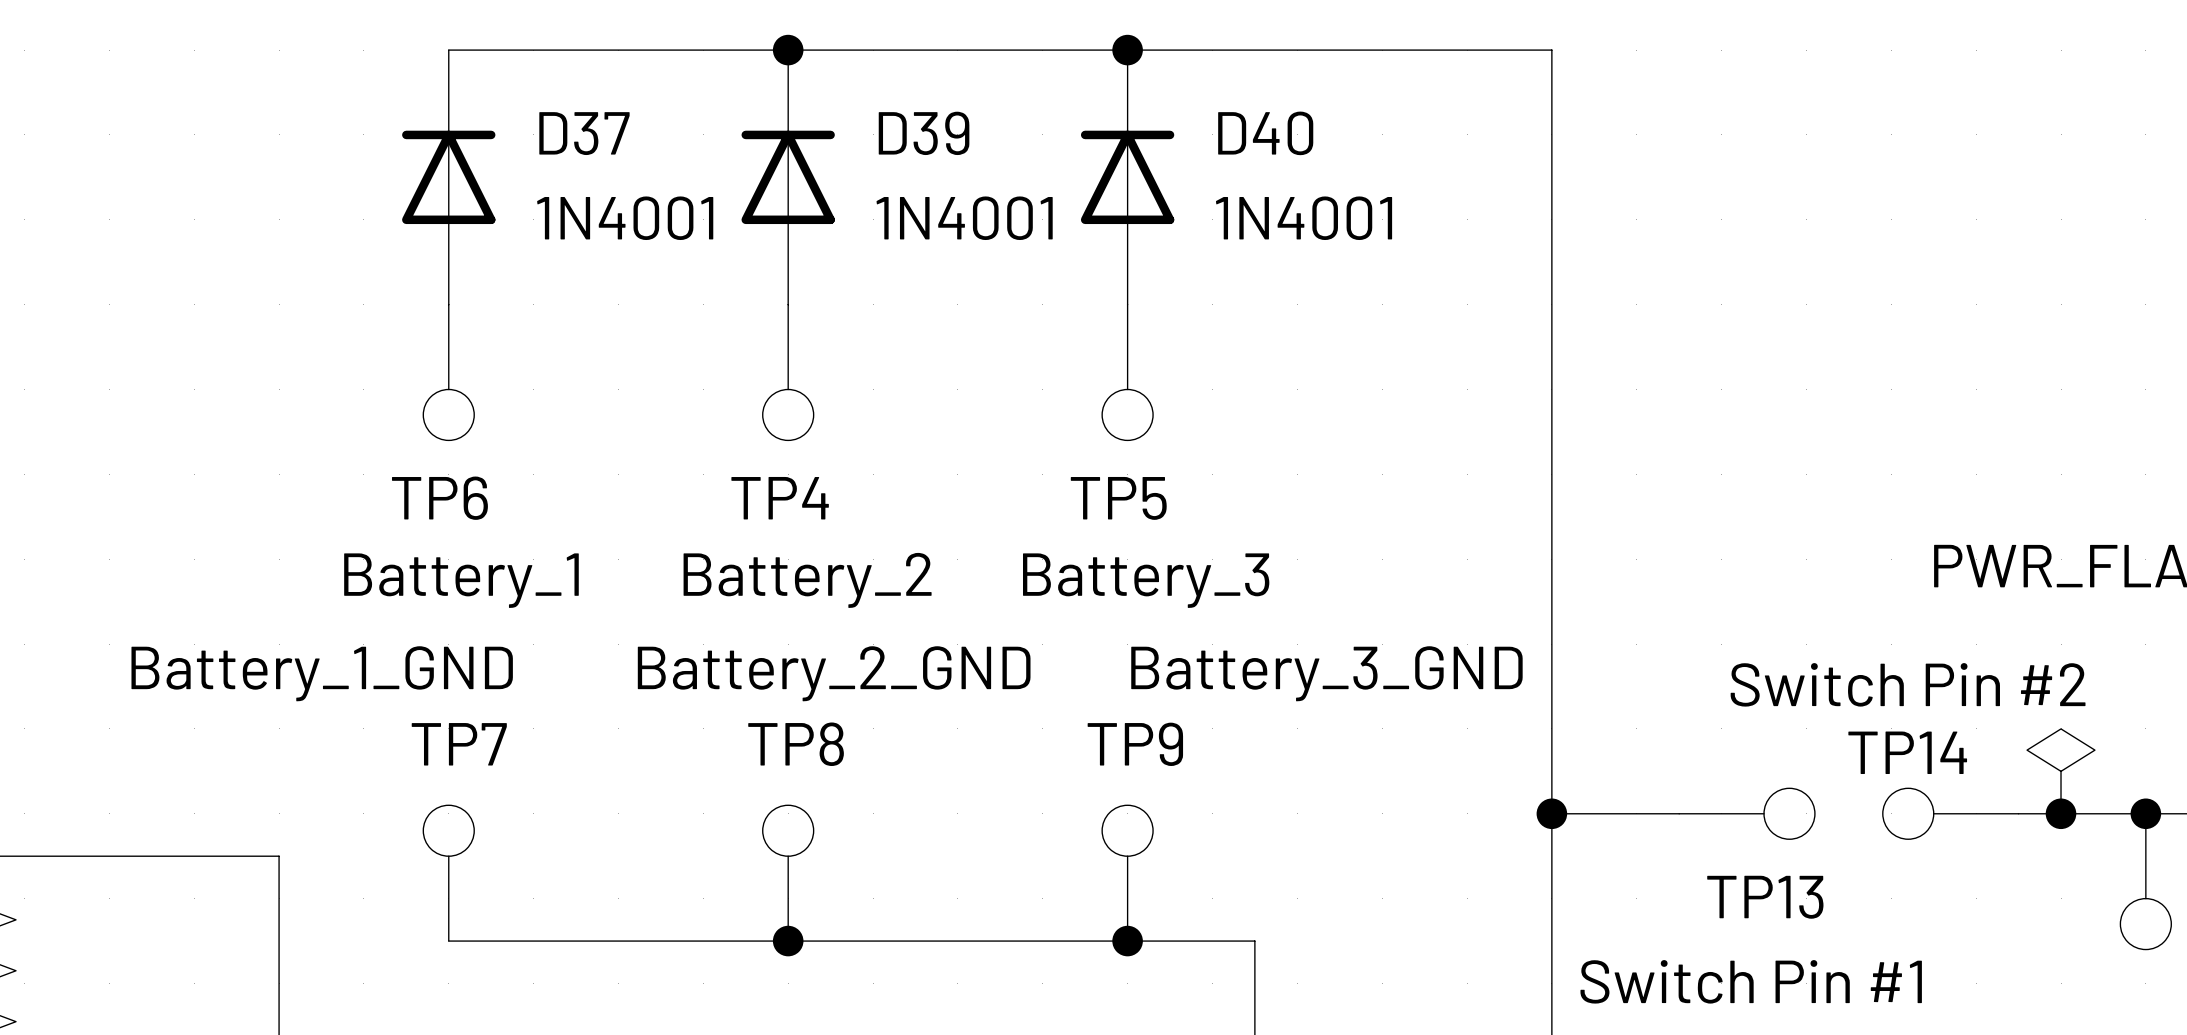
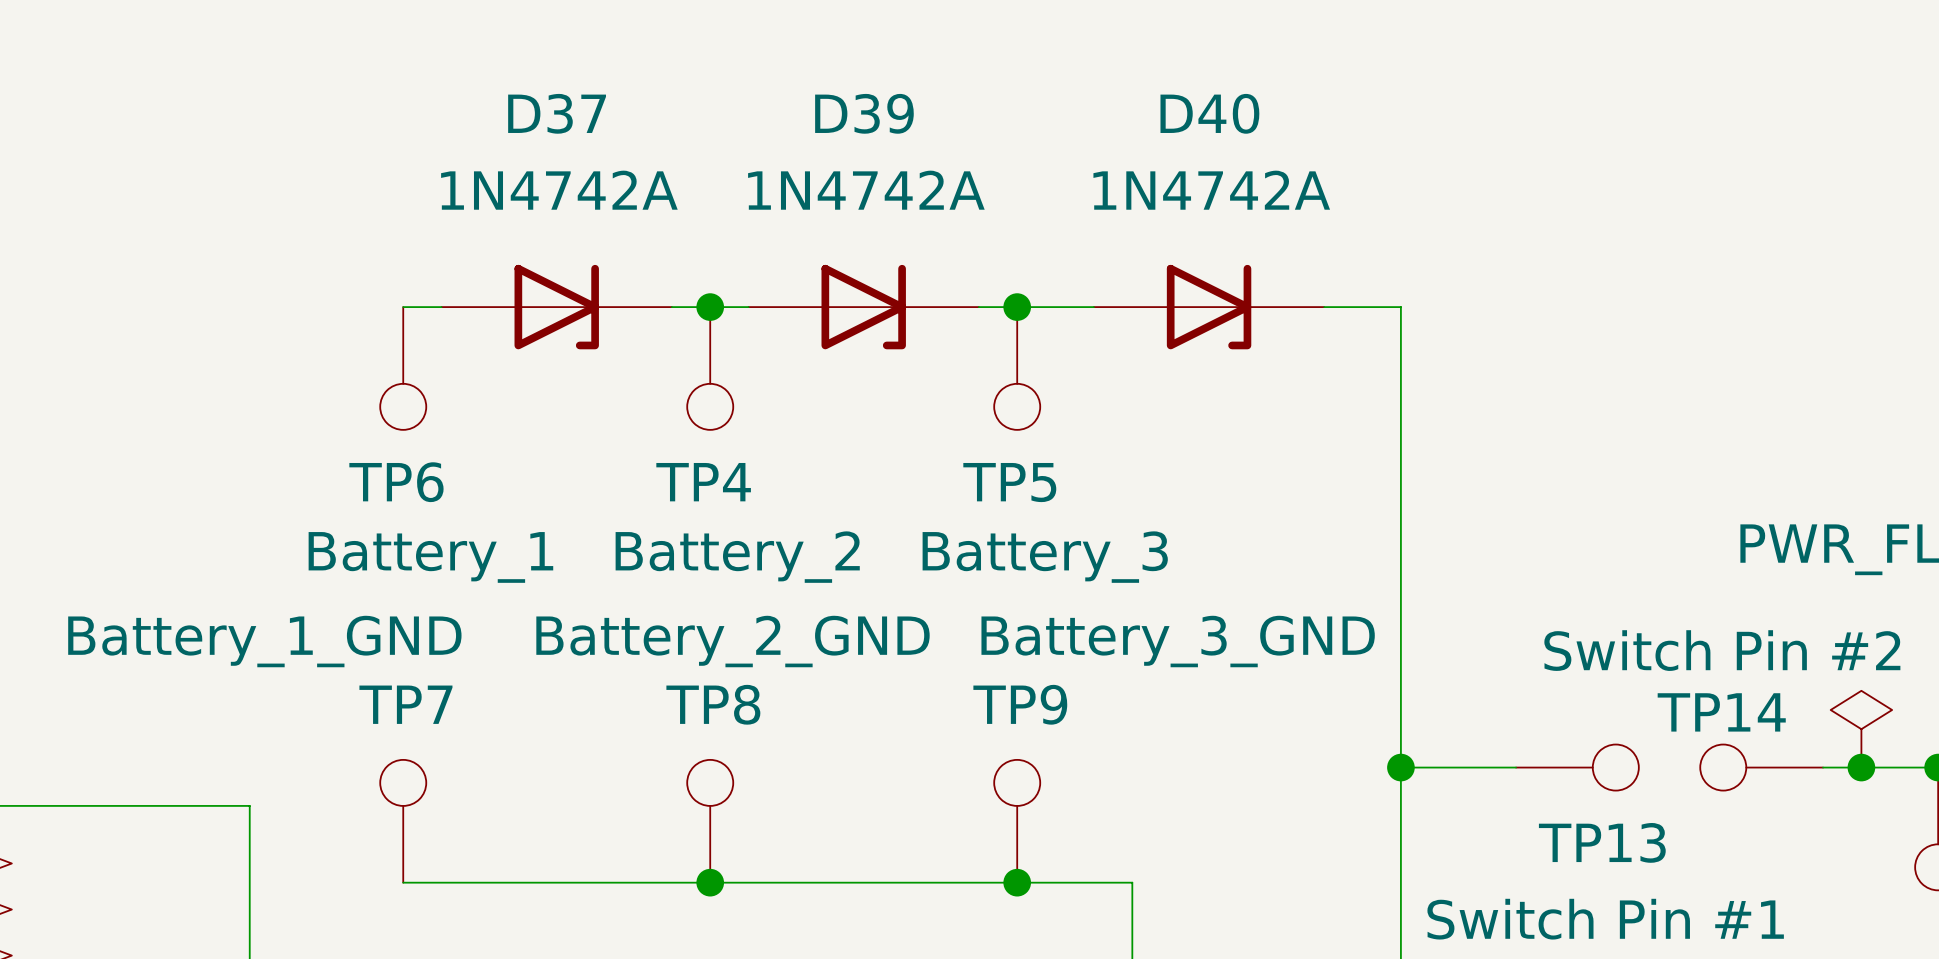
D37 symbol: [402, 50, 496, 305] -> [441, 264, 672, 350]
wire: (448, 50) (1551, 50) (1551, 304) -> (1324, 307) (1400, 307)
D39 symbol: [741, 50, 835, 305] -> [748, 264, 979, 350]
junction: (788, 50) -> none
D40 symbol: [1080, 50, 1175, 305] -> [1093, 264, 1325, 350]
junction: (1127, 50) -> none
D37 name position: D37 (584, 133) -> D37 (557, 113)
D39 name position: D39 (924, 133) -> D39 (864, 113)
D40 name position: D40 (1265, 133) -> D40 (1209, 113)
D37 value: 1N4001 (625, 218) -> 1N4742A (559, 190)
D39 value: 1N4001 (964, 218) -> 1N4742A (866, 190)
D40 value: 1N4001 (1304, 218) -> 1N4742A (1211, 190)
wire: none -> (403, 307) (441, 307)
wire: none -> (671, 307) (748, 307)
junction: none -> (710, 307)
wire: none -> (978, 307) (1093, 307)
junction: none -> (1017, 307)

